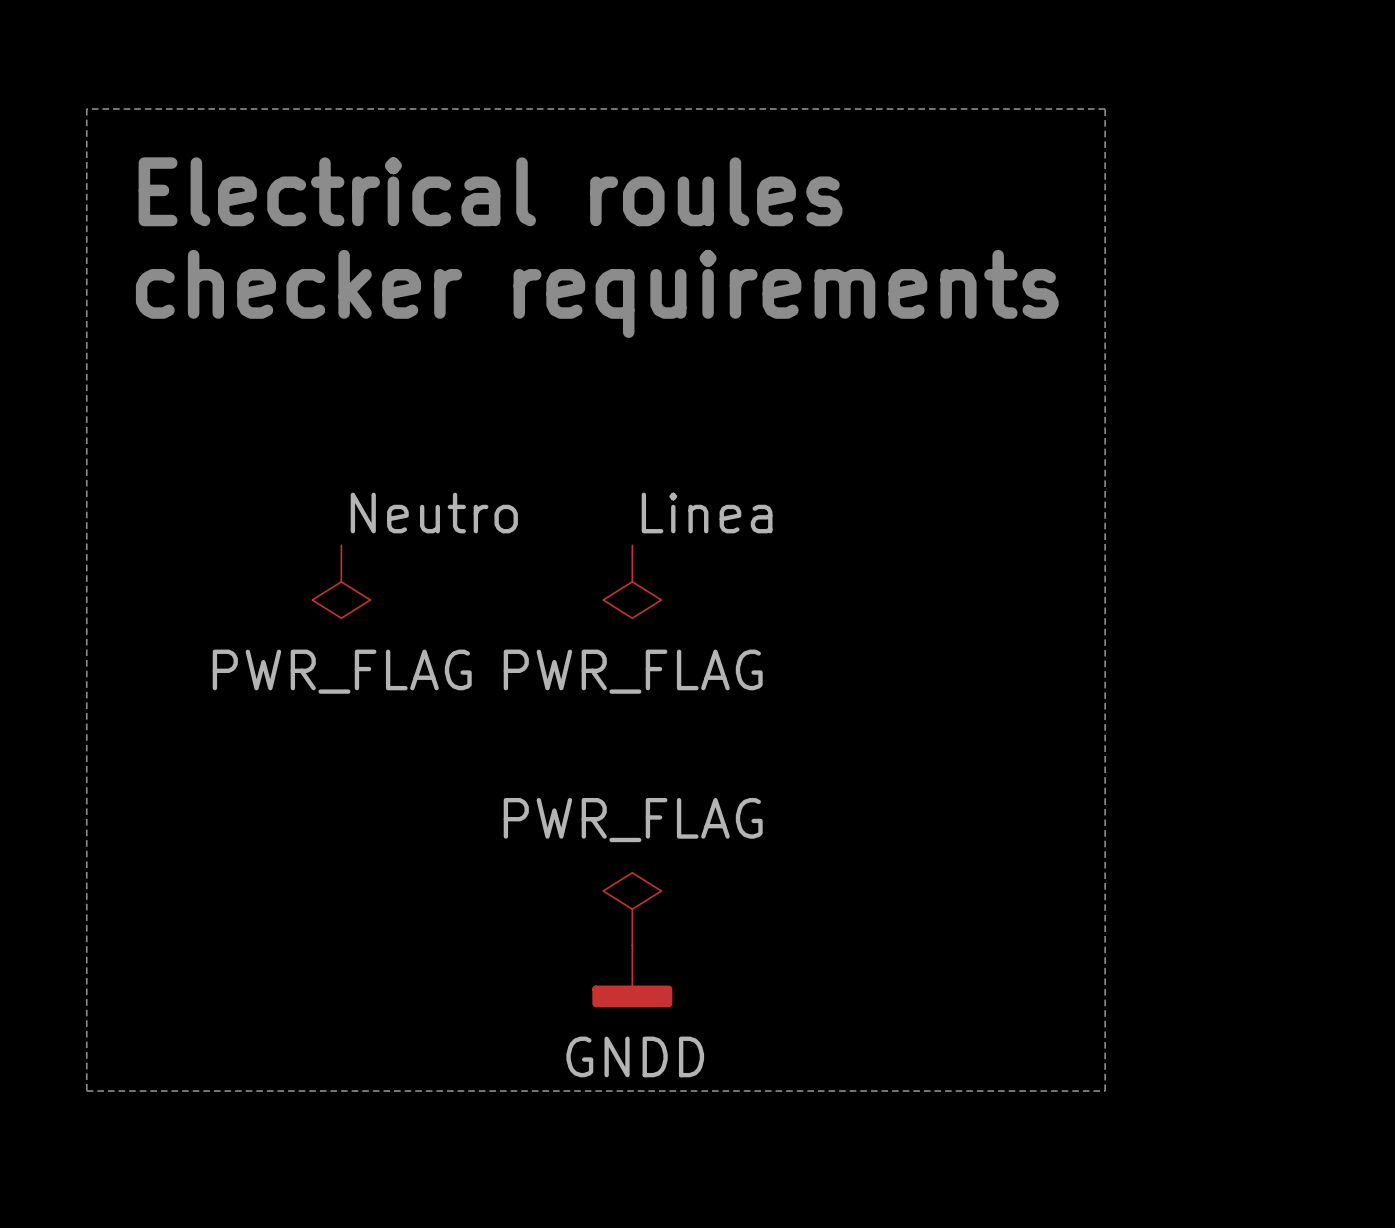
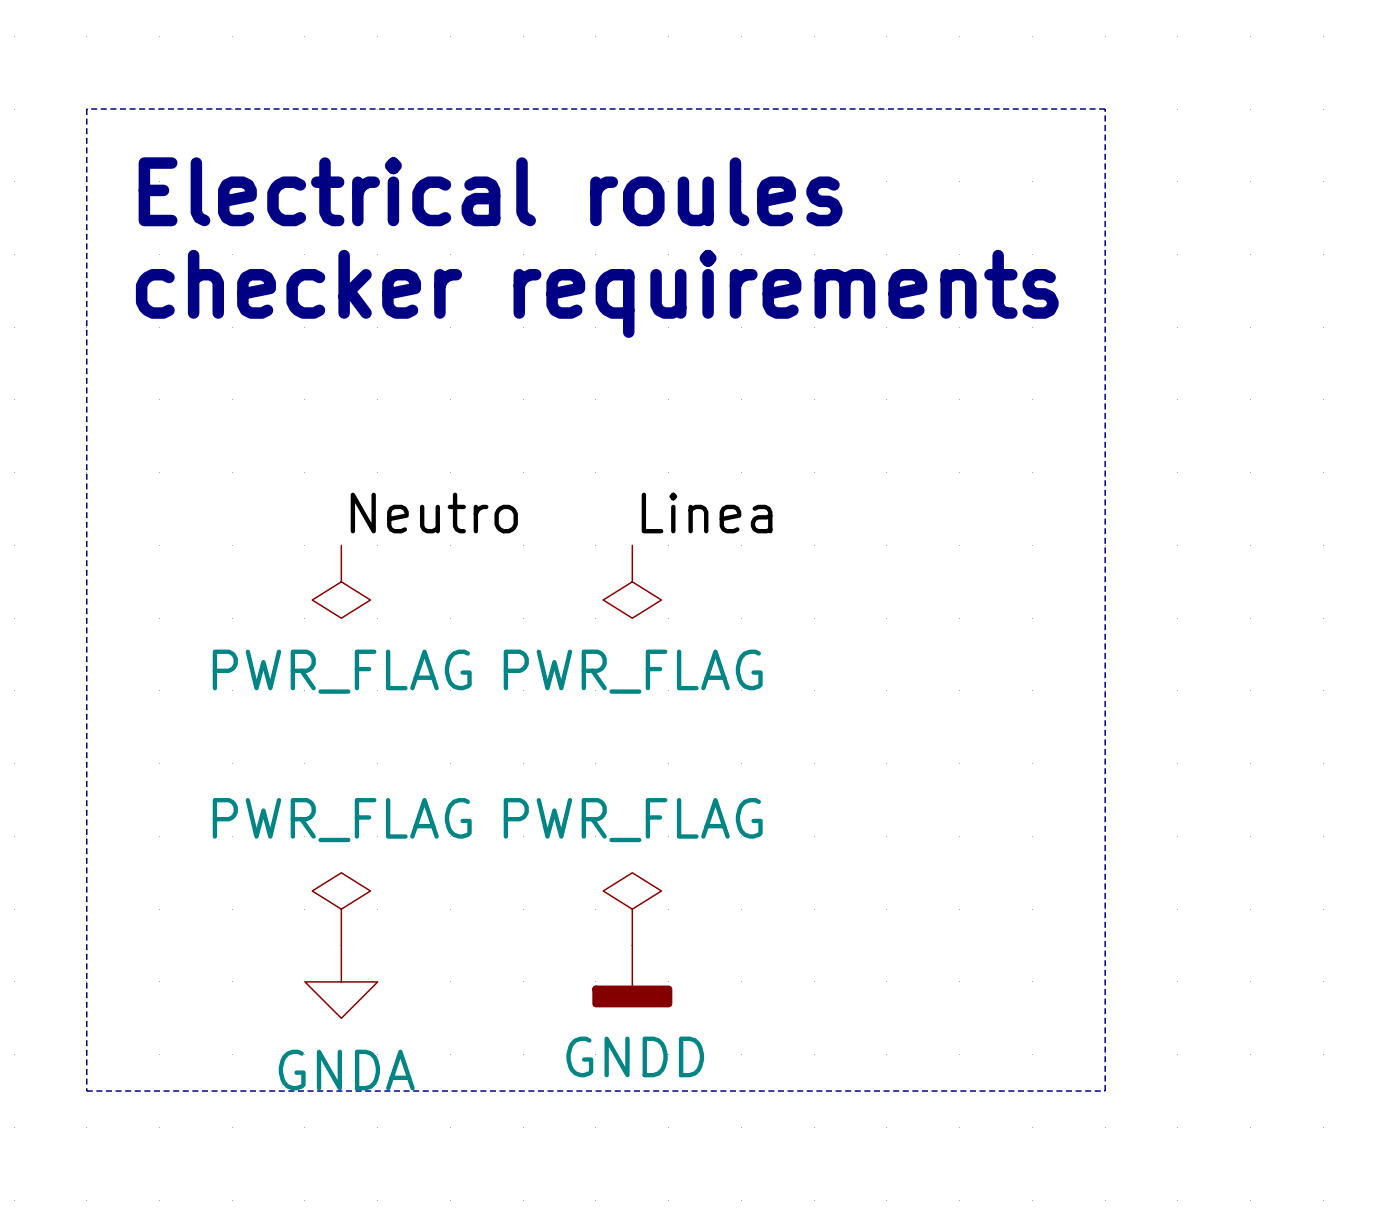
power symbol: none -> PWR_FLAG (341, 909)
power symbol: none -> GNDA (341, 981)

